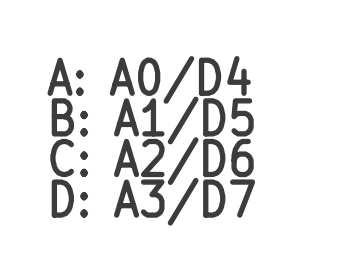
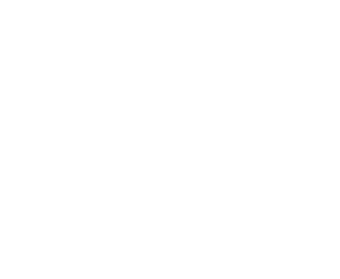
text: A: A0/D4 (149, 79) -> none
text: B: A1/D5 (152, 120) -> none
text: C: A2/D6 (152, 161) -> none
text: D: A3/D7 (153, 201) -> none

